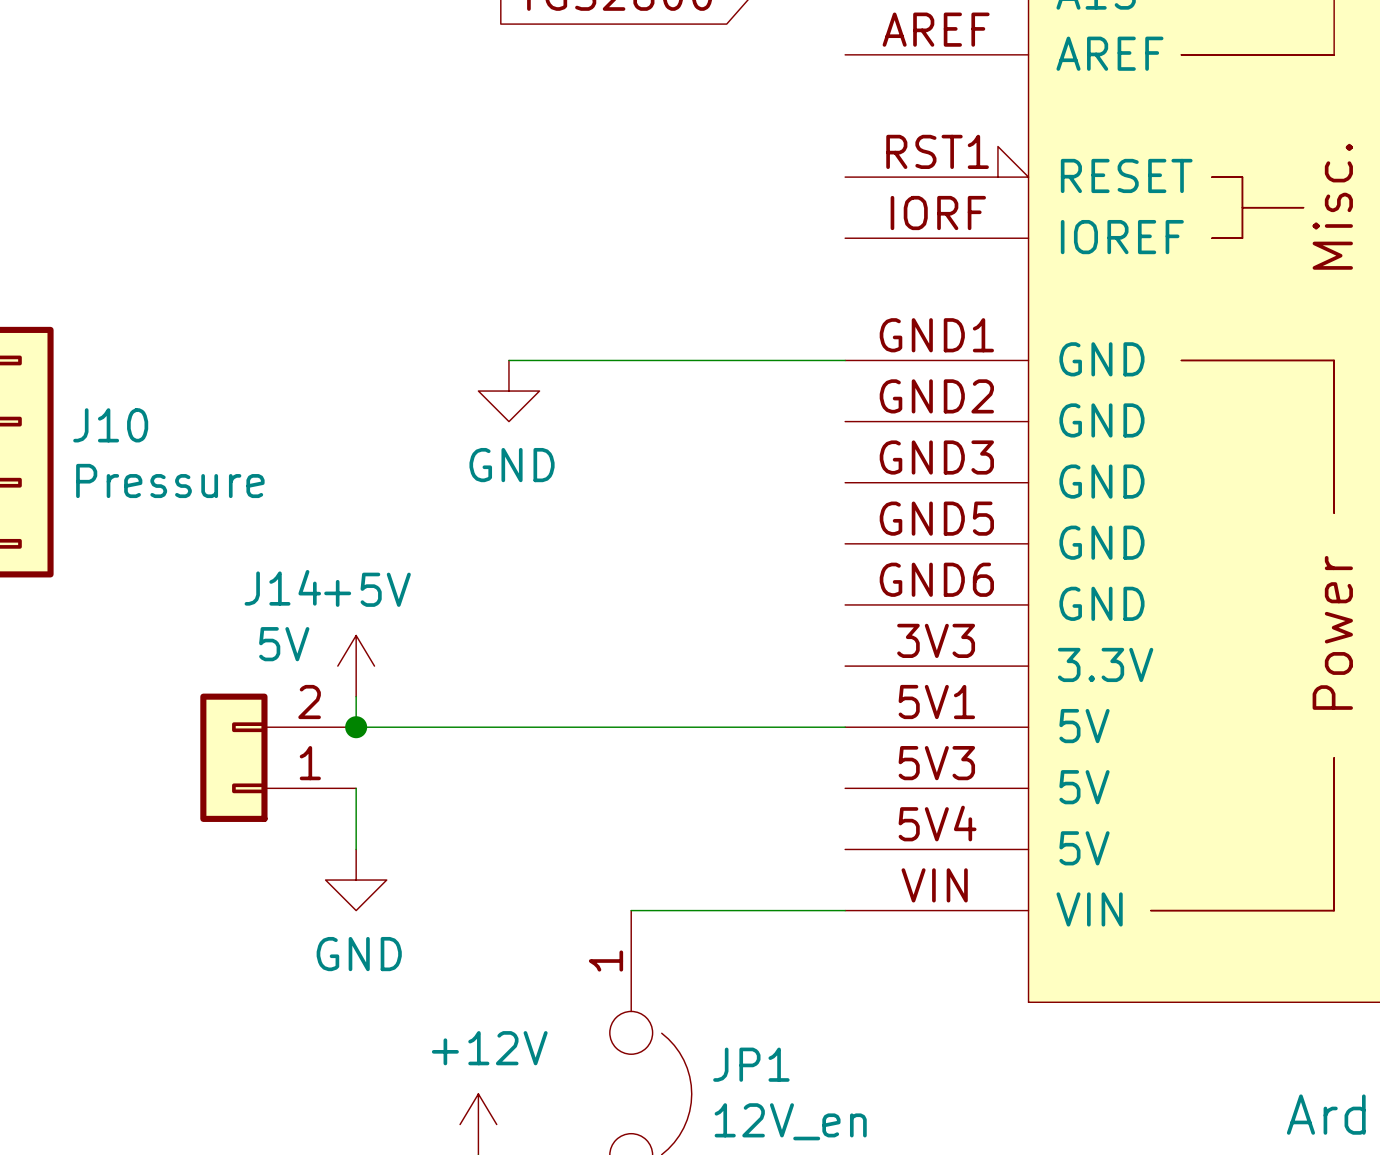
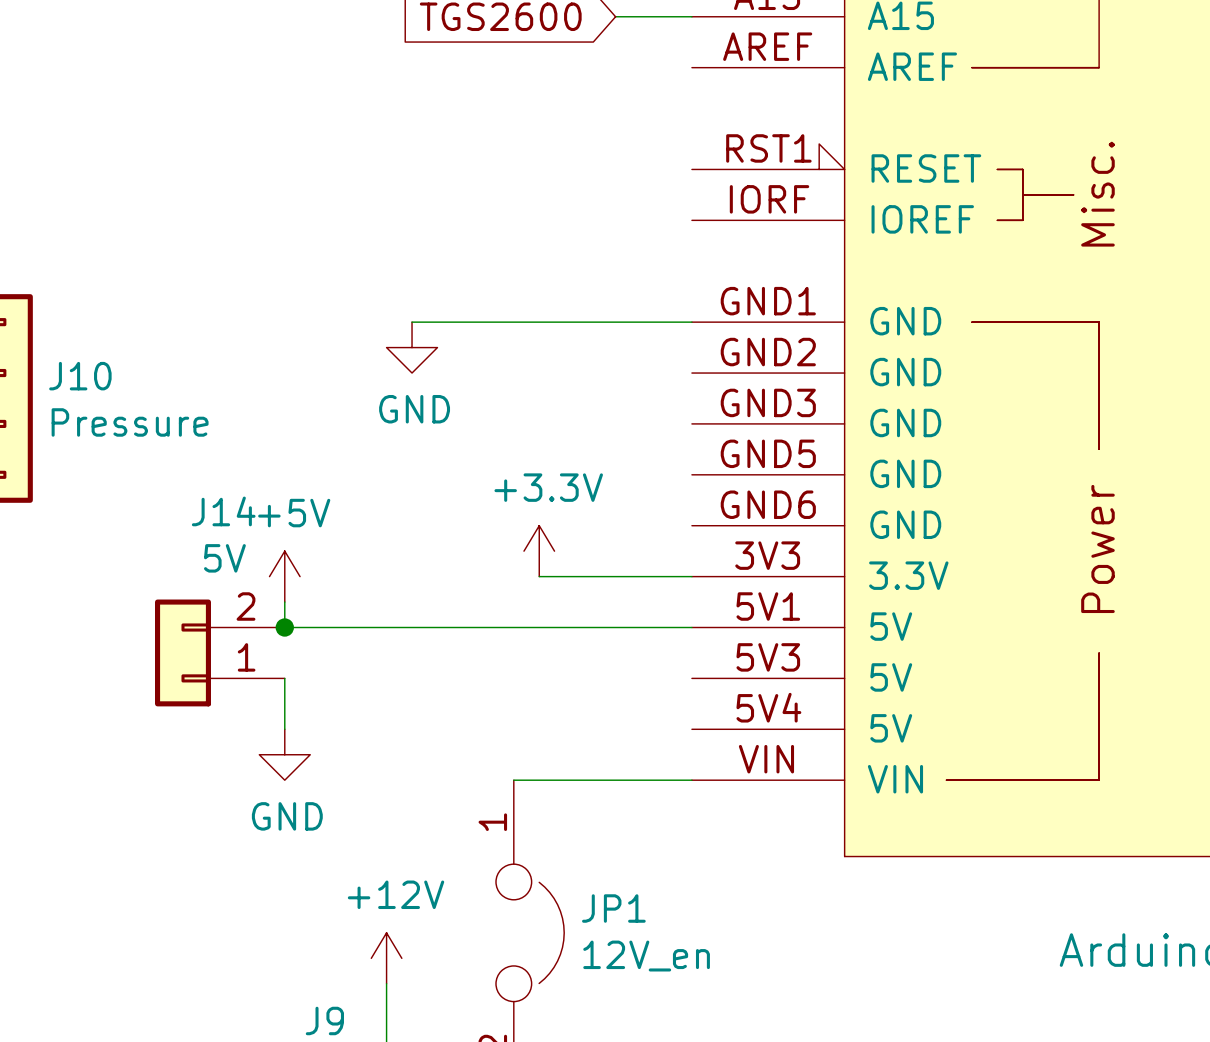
power symbol: none -> +3.3V (539, 551)
wire: none -> (539, 576) (691, 576)

